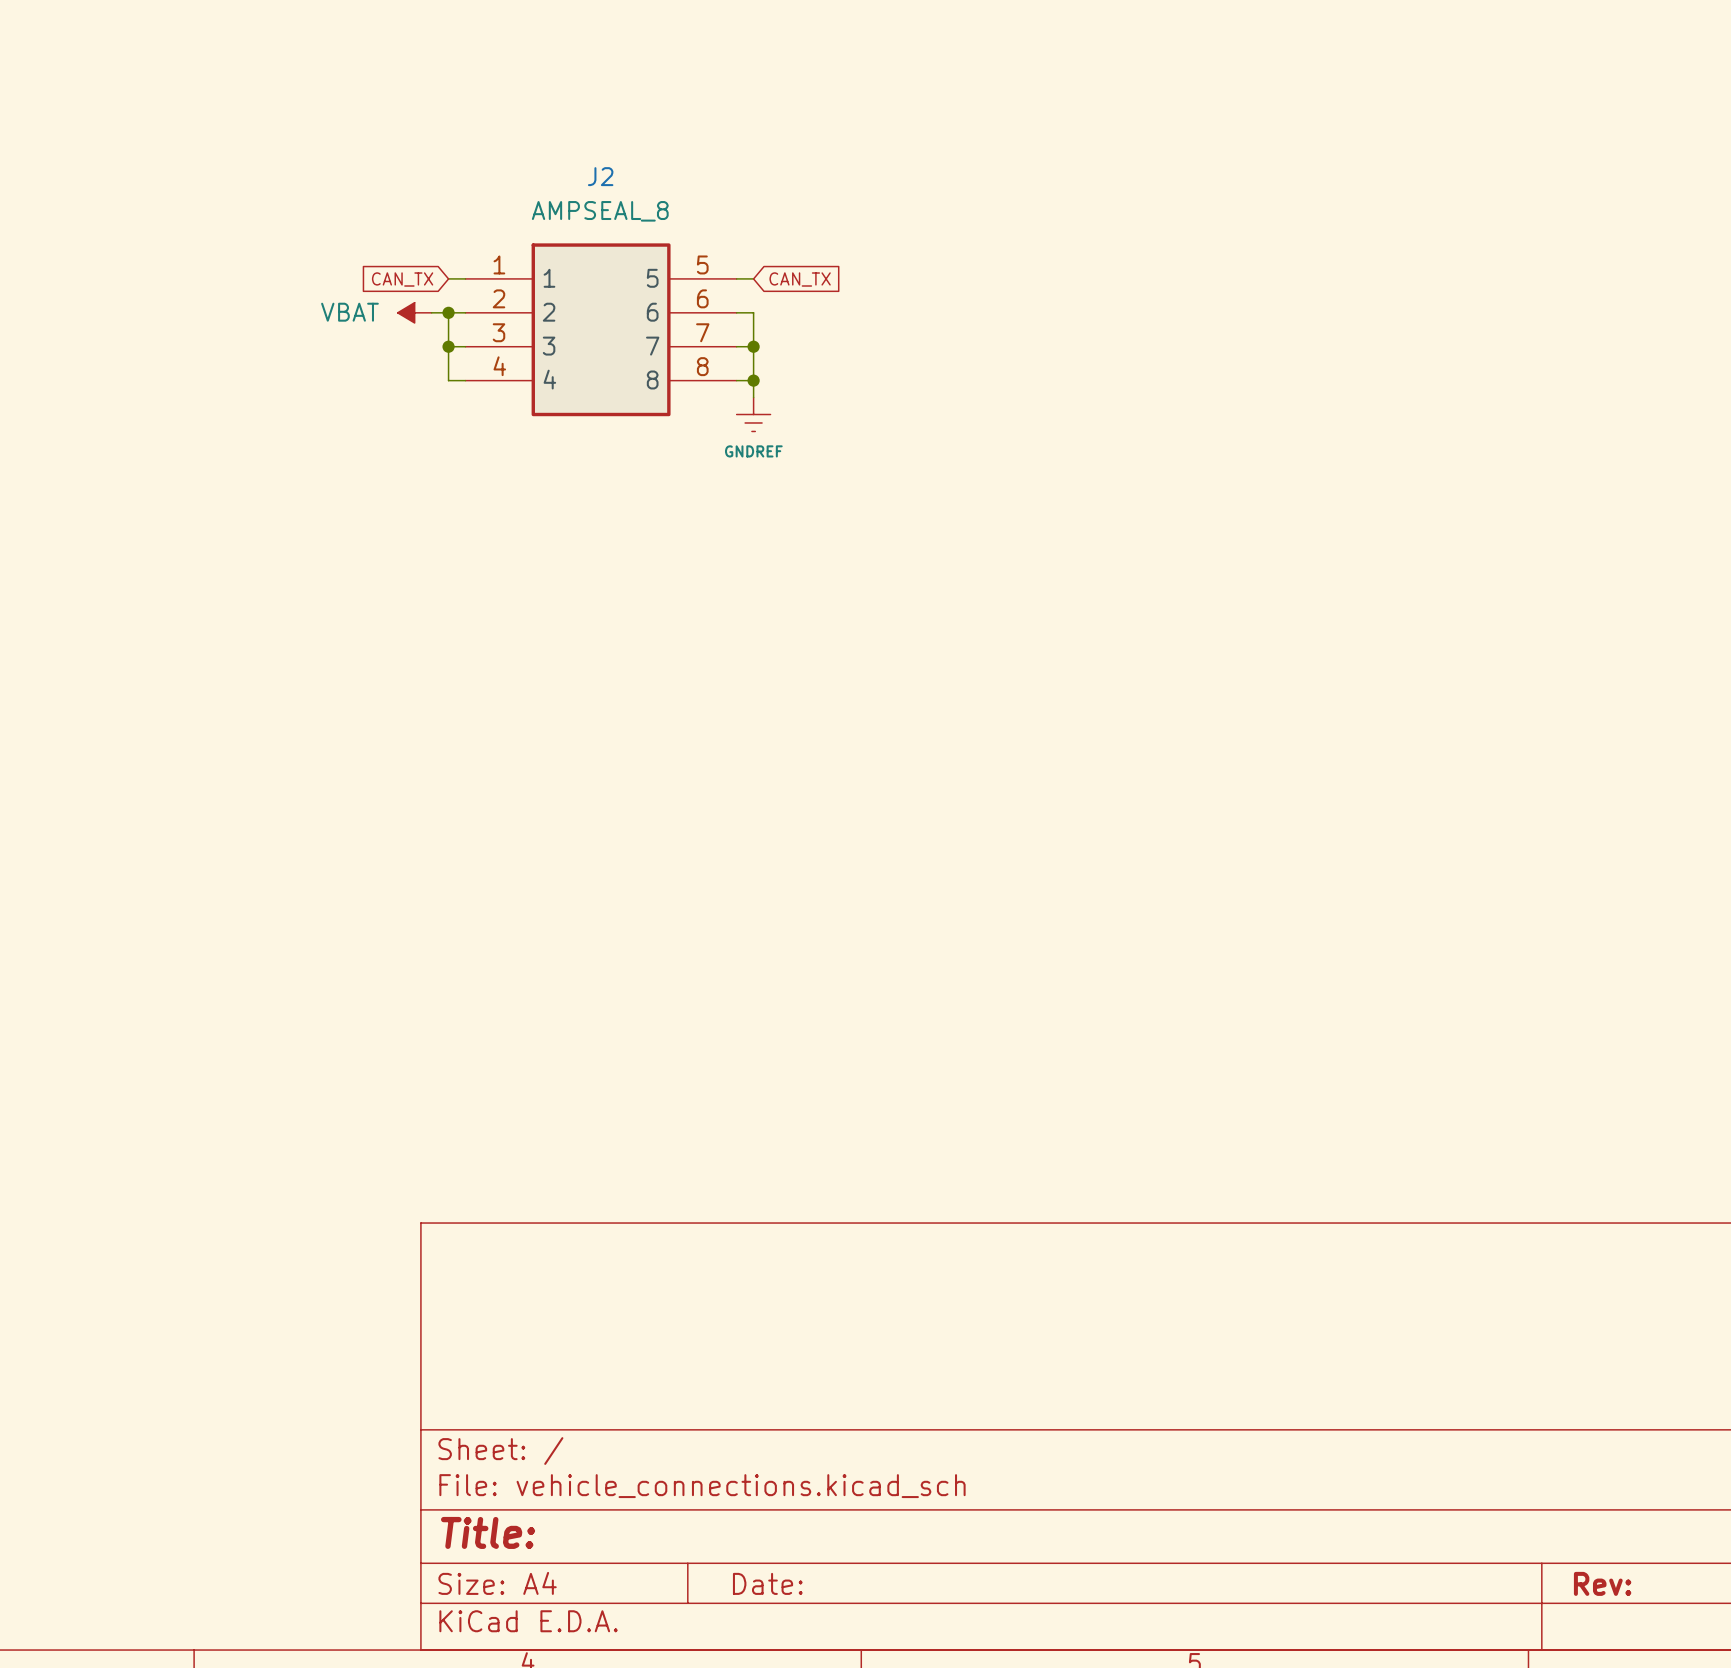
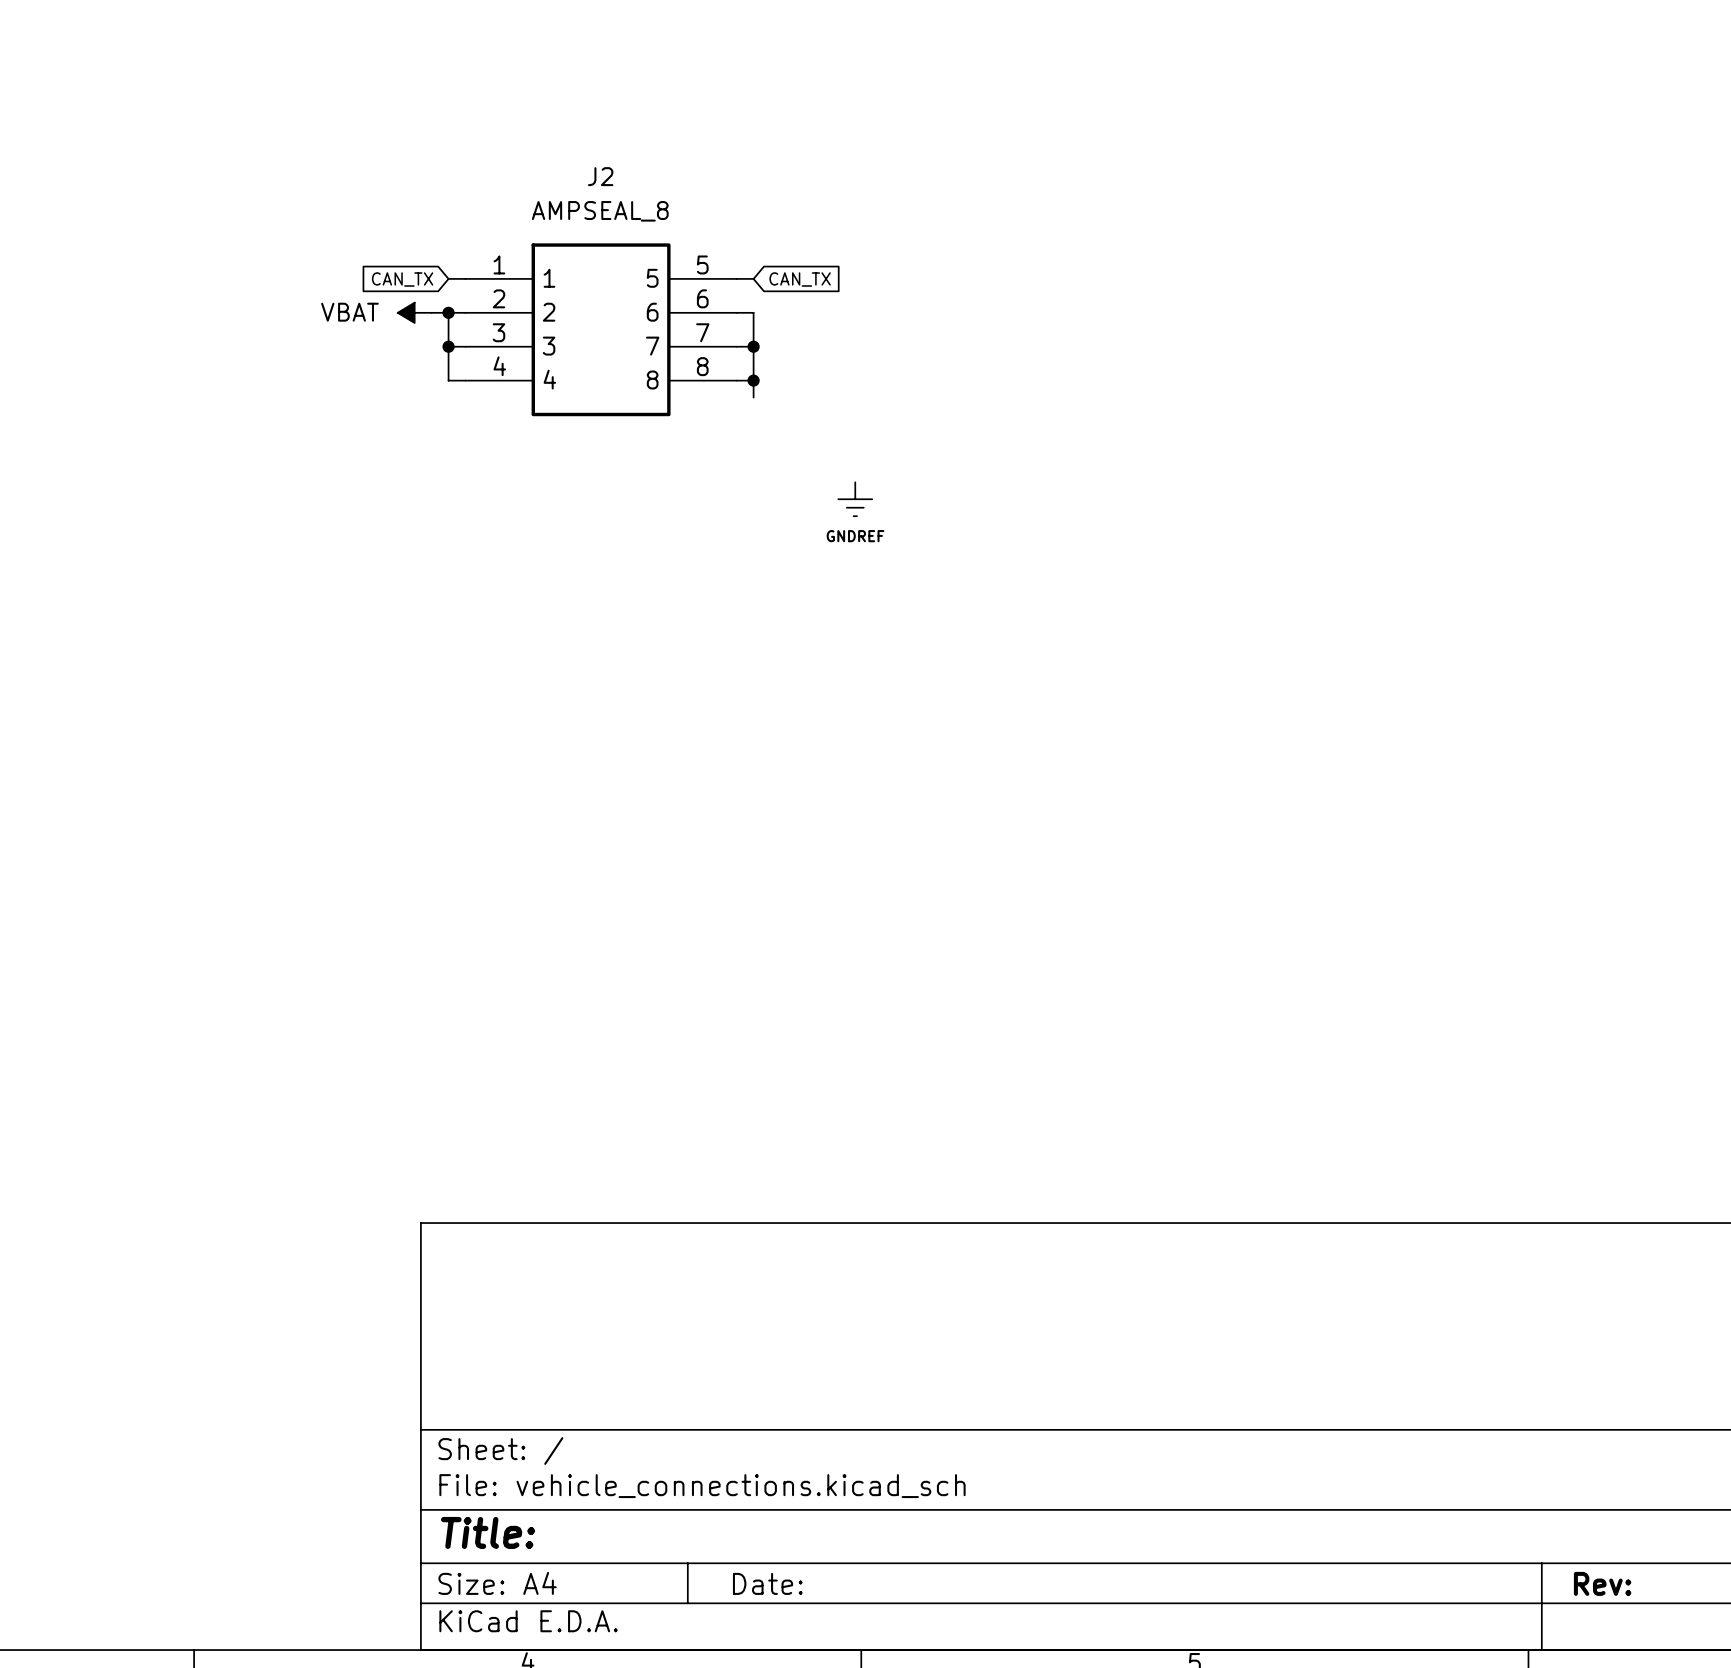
power symbol position: GNDREF (753, 414) -> GNDREF (855, 499)

